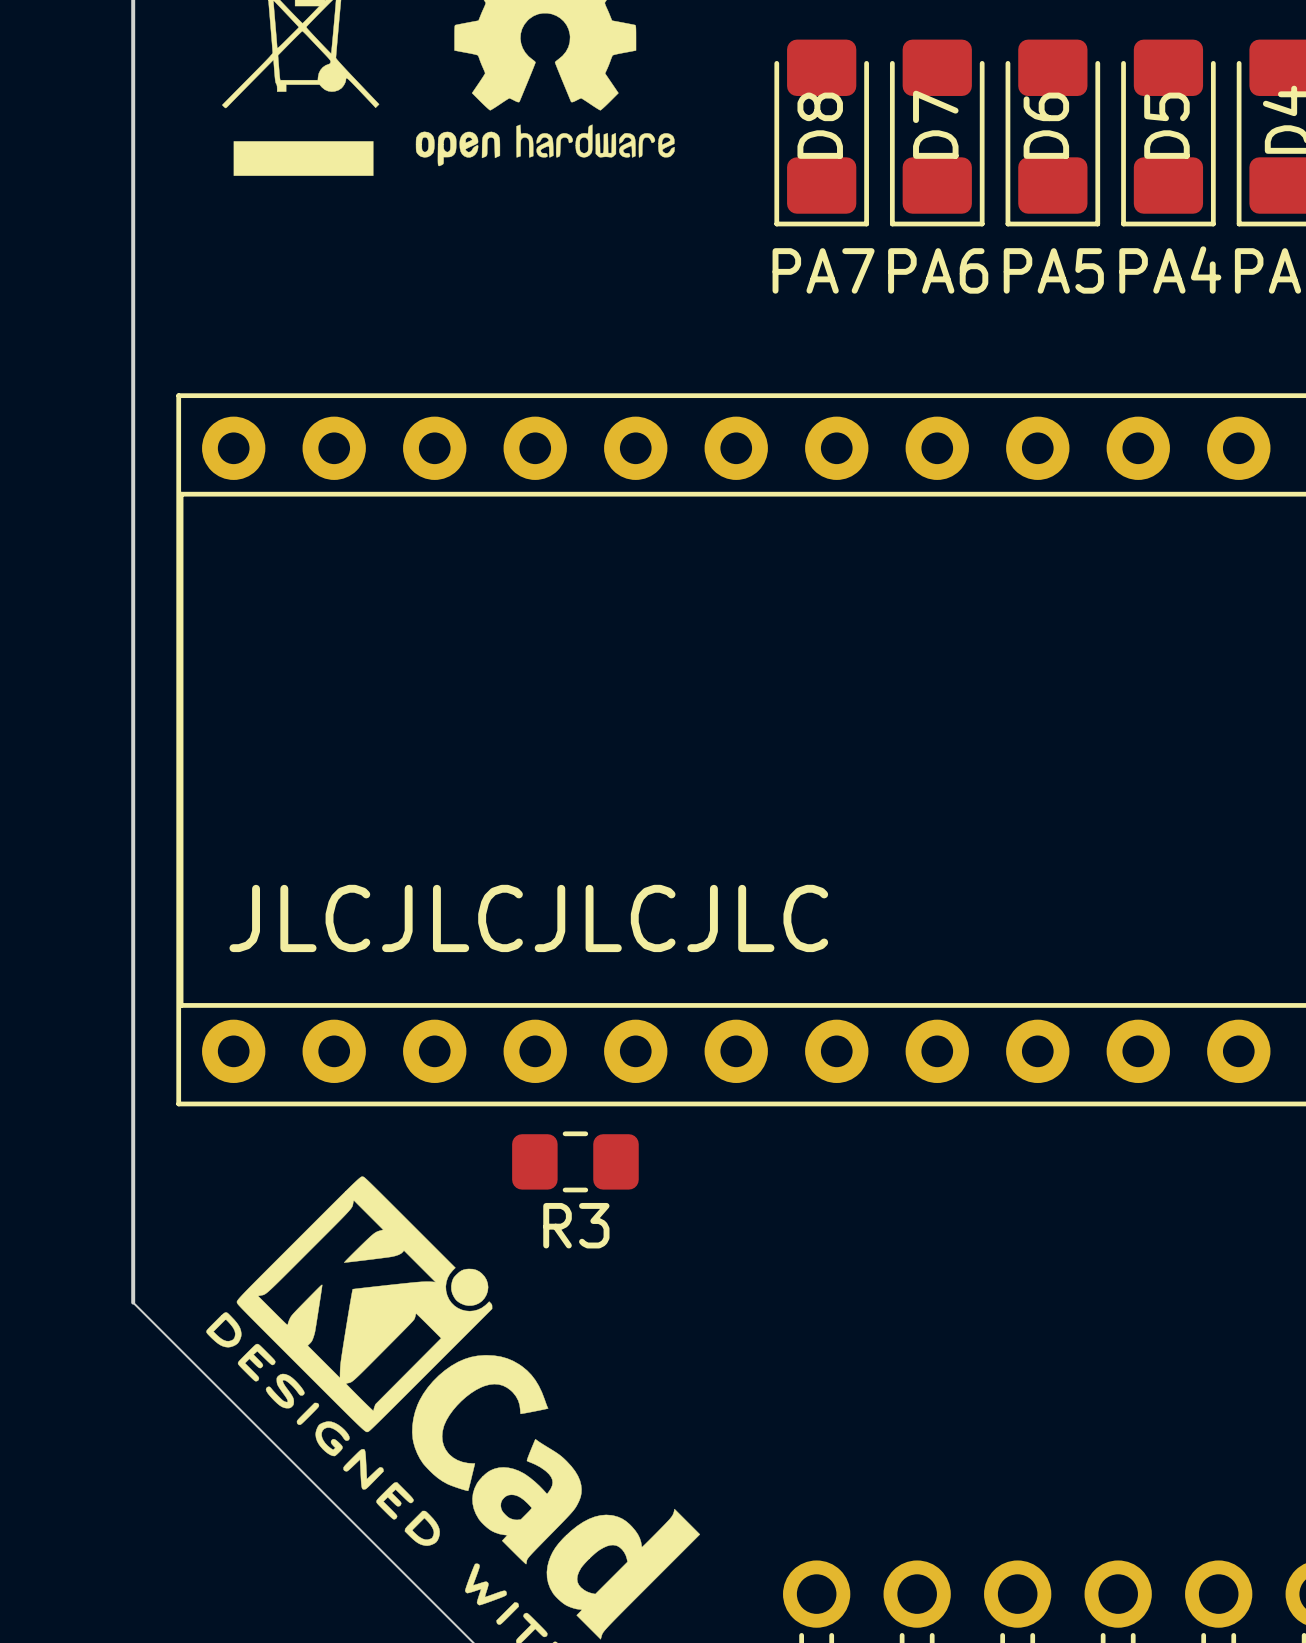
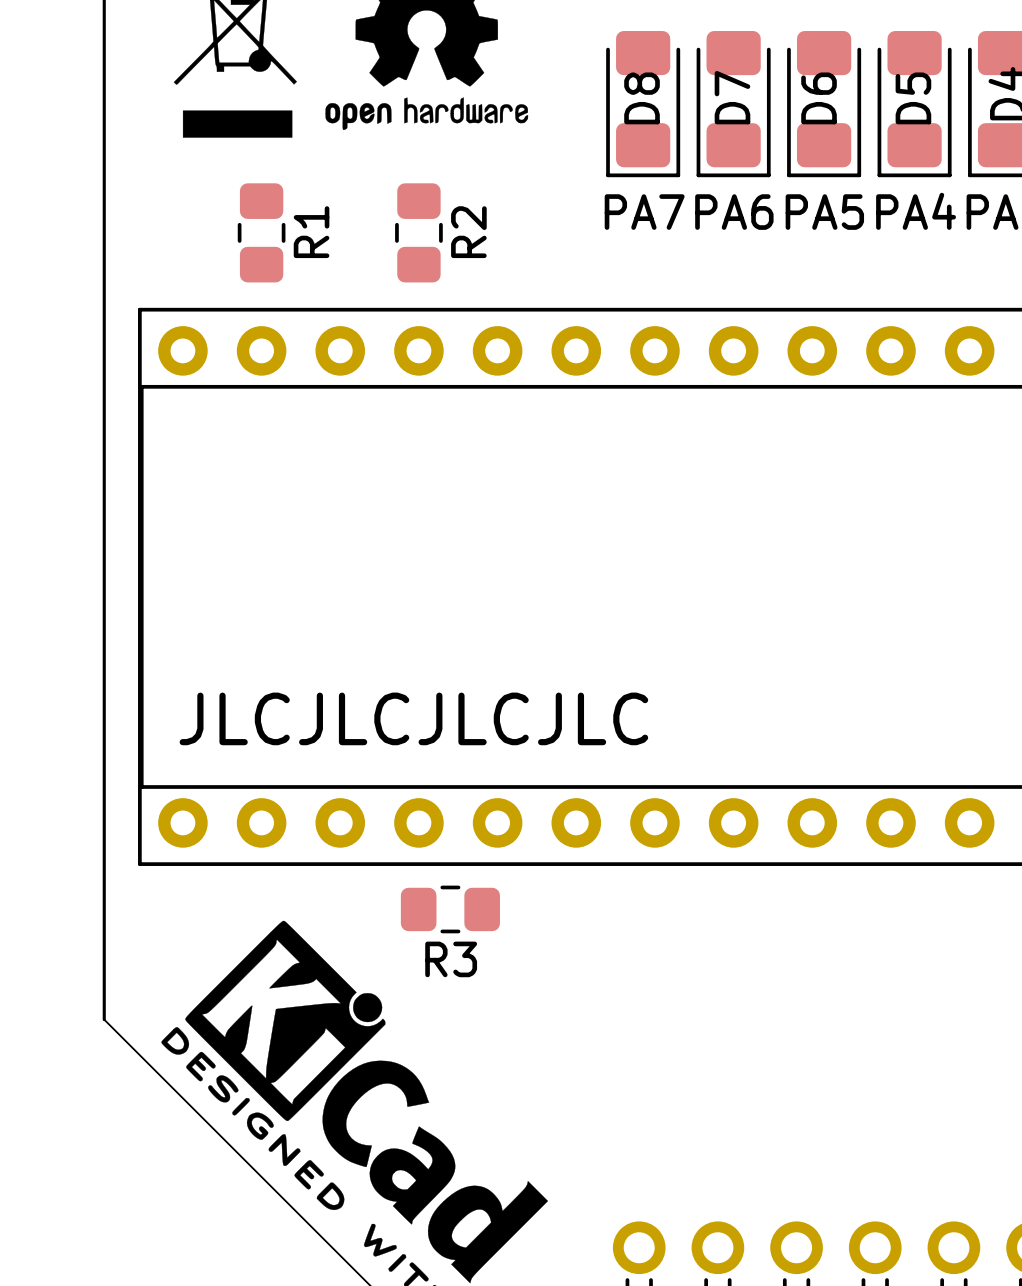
R1: none -> (261, 232)
R2: none -> (418, 232)

